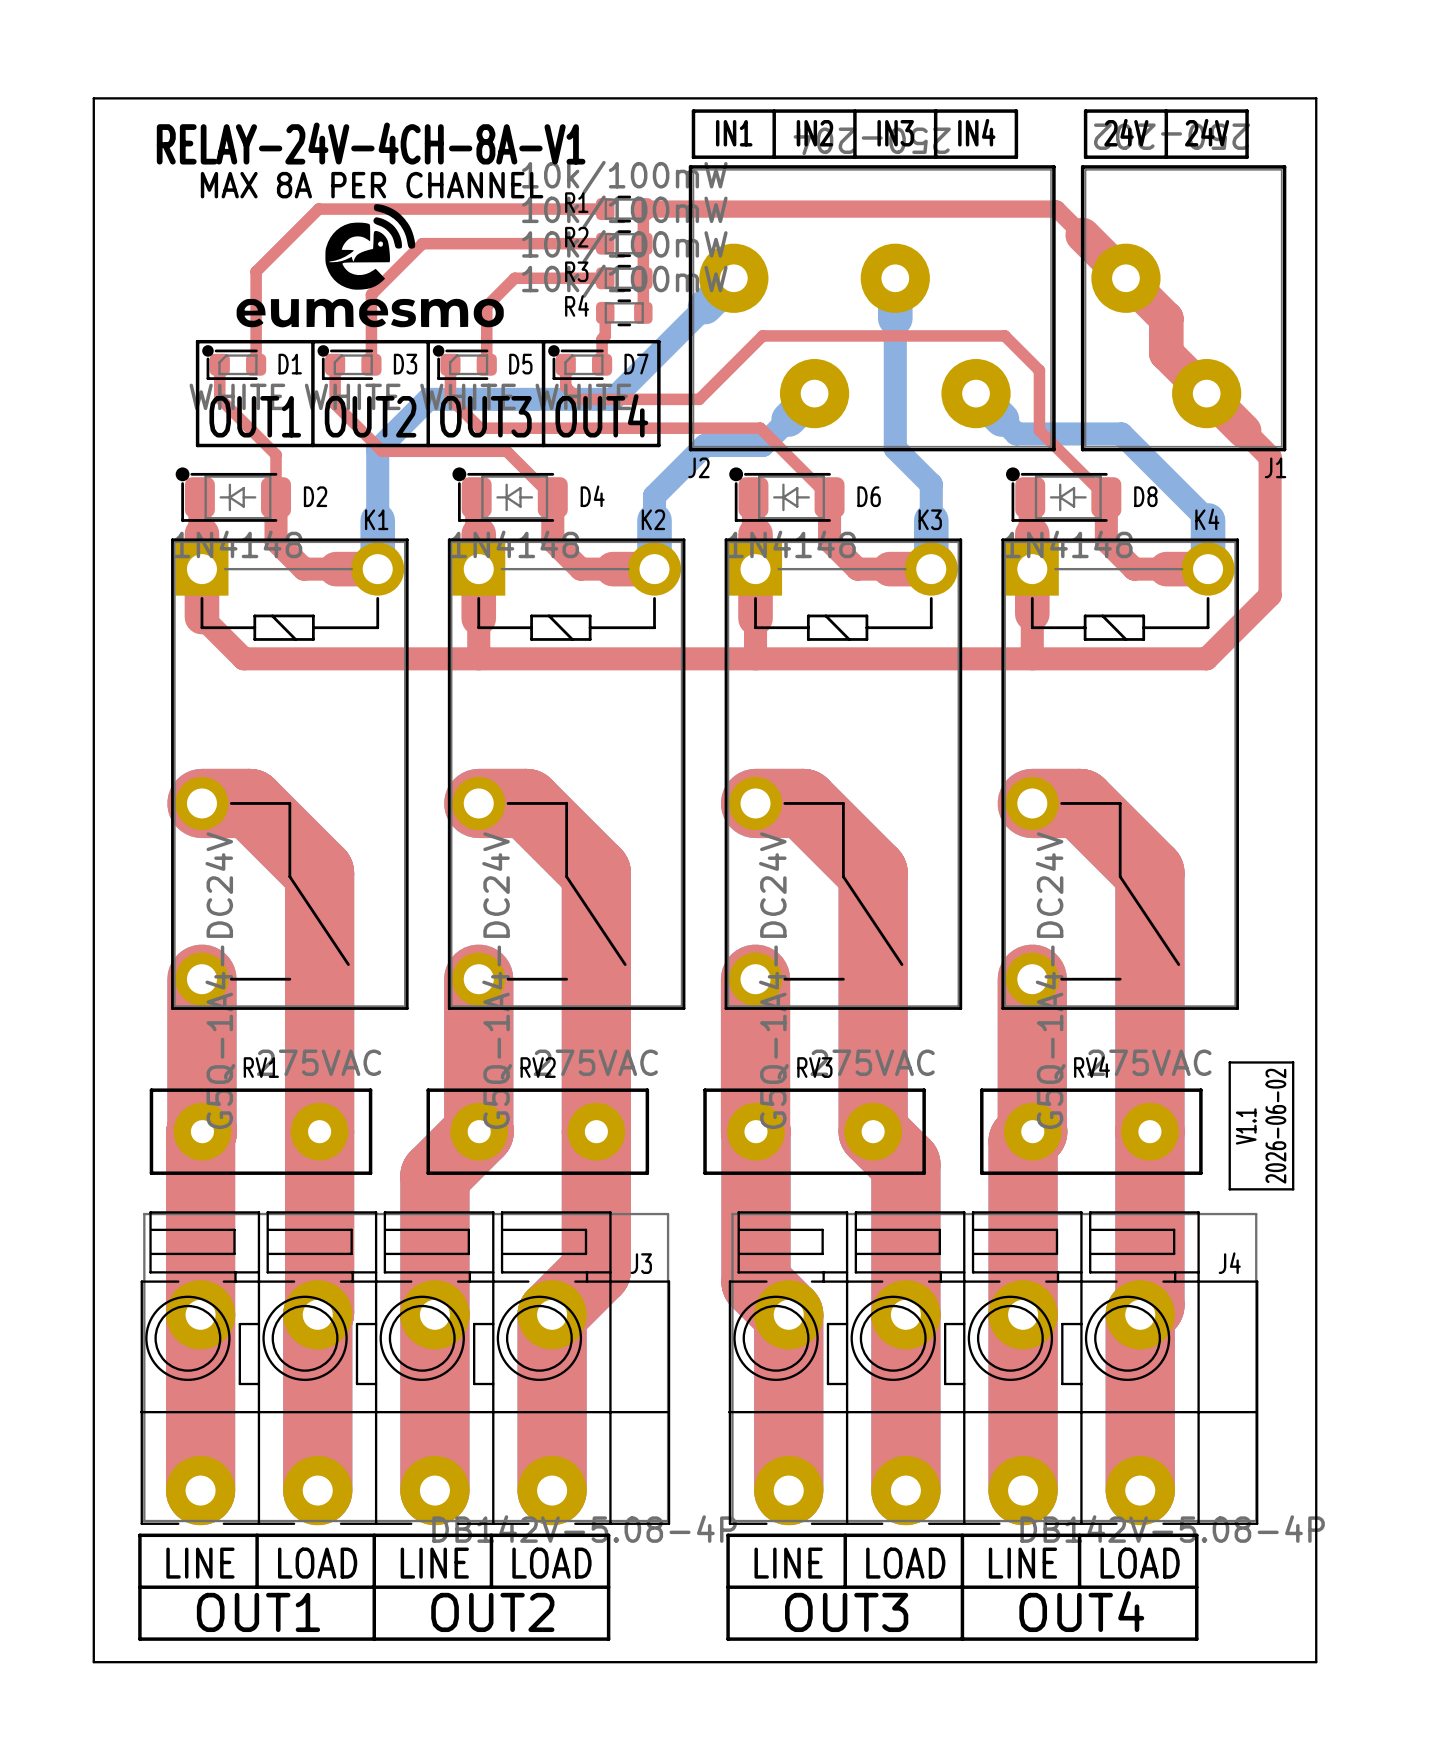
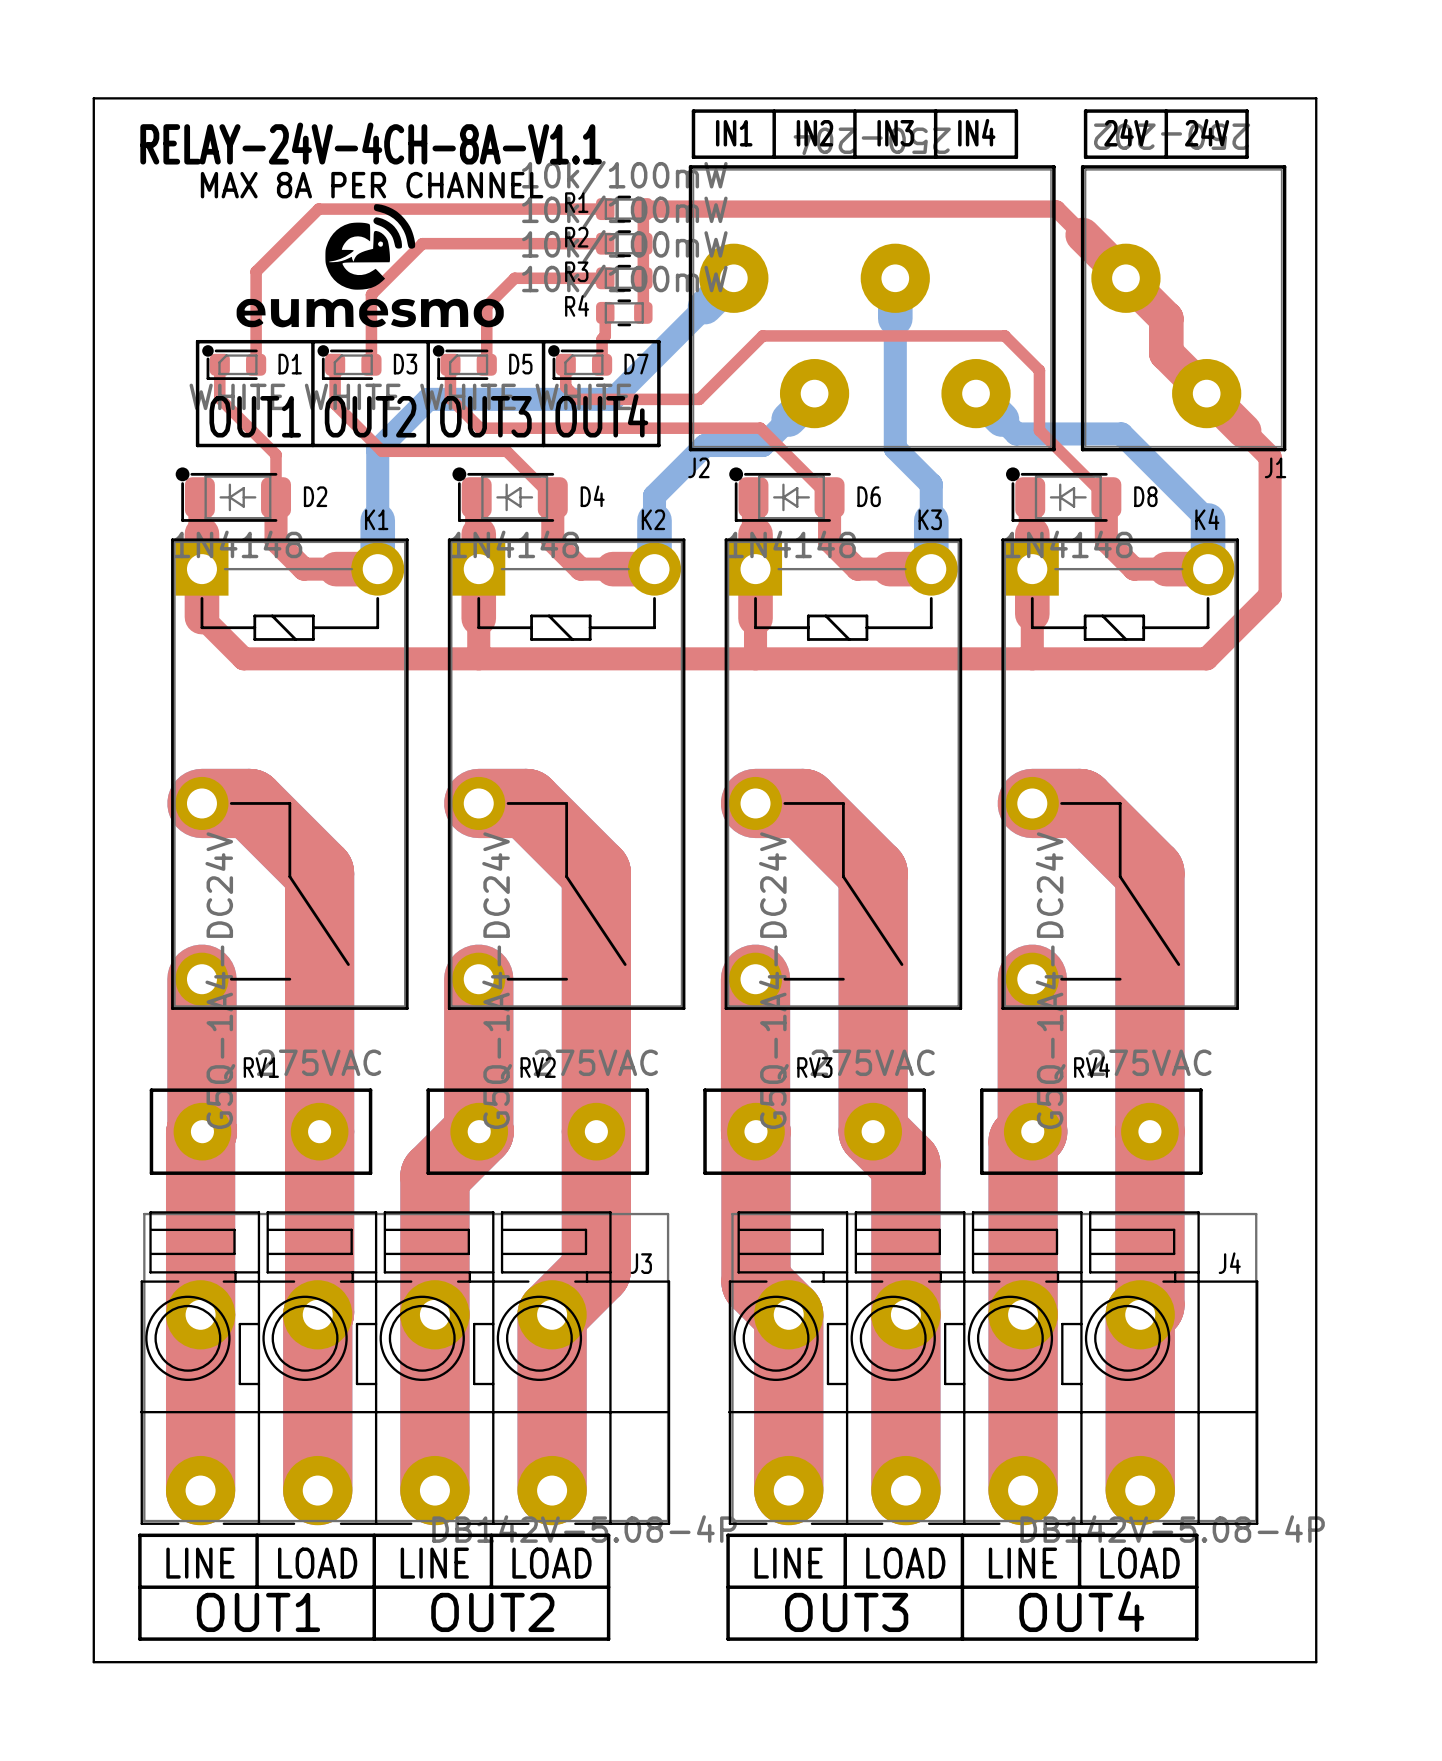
text: RELAY-24V-4CH-8A-V1 (371, 143) -> RELAY-24V-4CH-8A-V1.1 (371, 143)
line: (1229, 1062) (1293, 1062) (1293, 1189) (1229, 1189) (1229, 1062) -> none
text: V1.1 (1246, 1126) -> none
text: 2026-06-02 (1275, 1126) -> none

